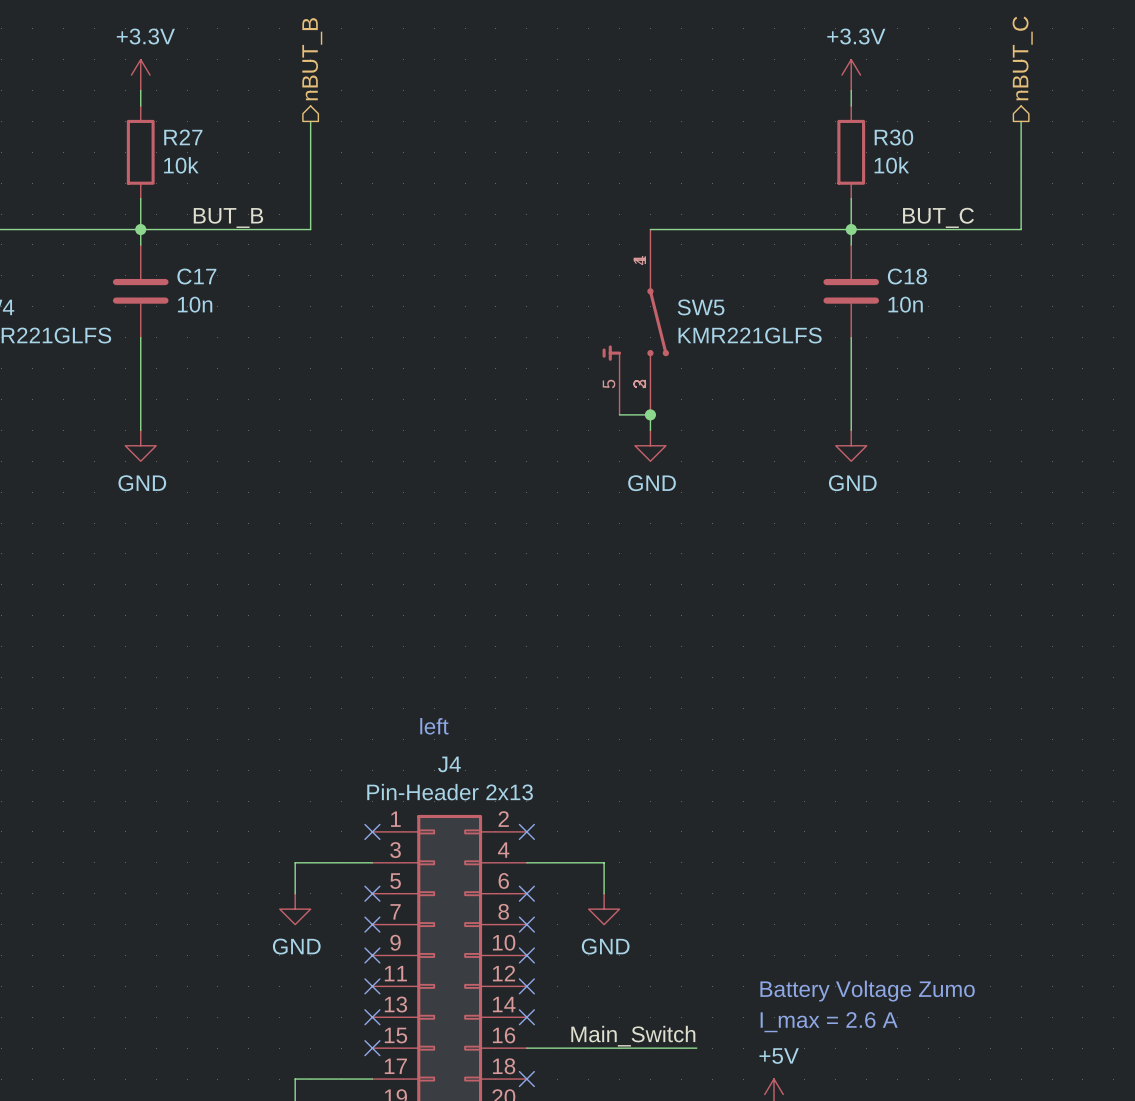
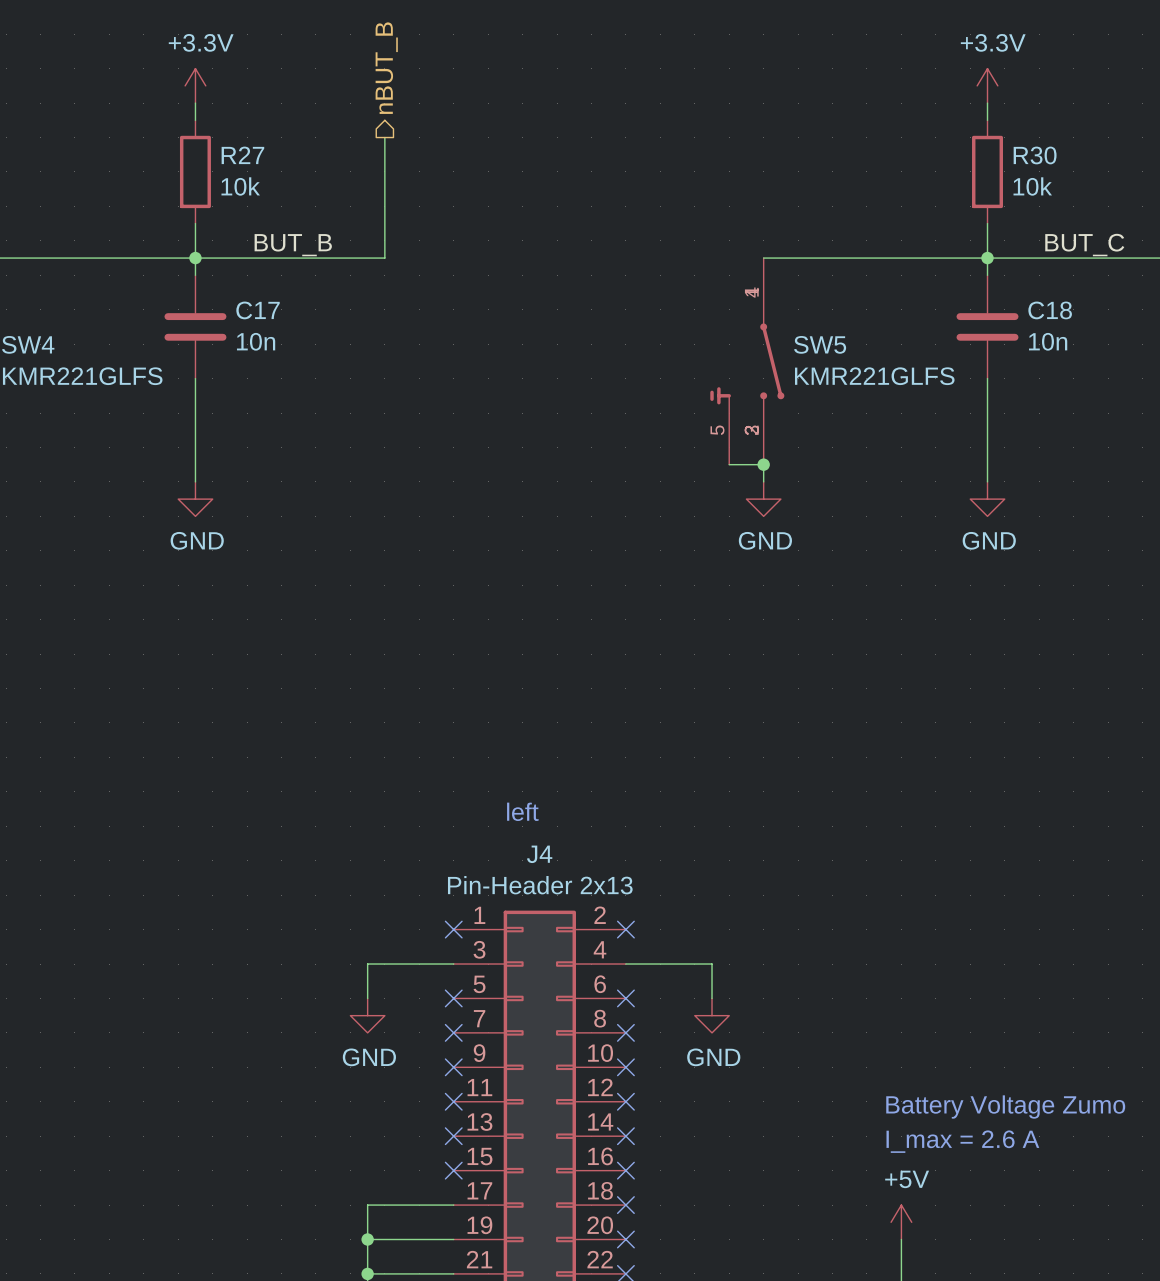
label: Main_Switch (633, 1036) -> none
wire: (526, 1048) (696, 1048) -> none
no-connect mark: none -> (625, 1170)

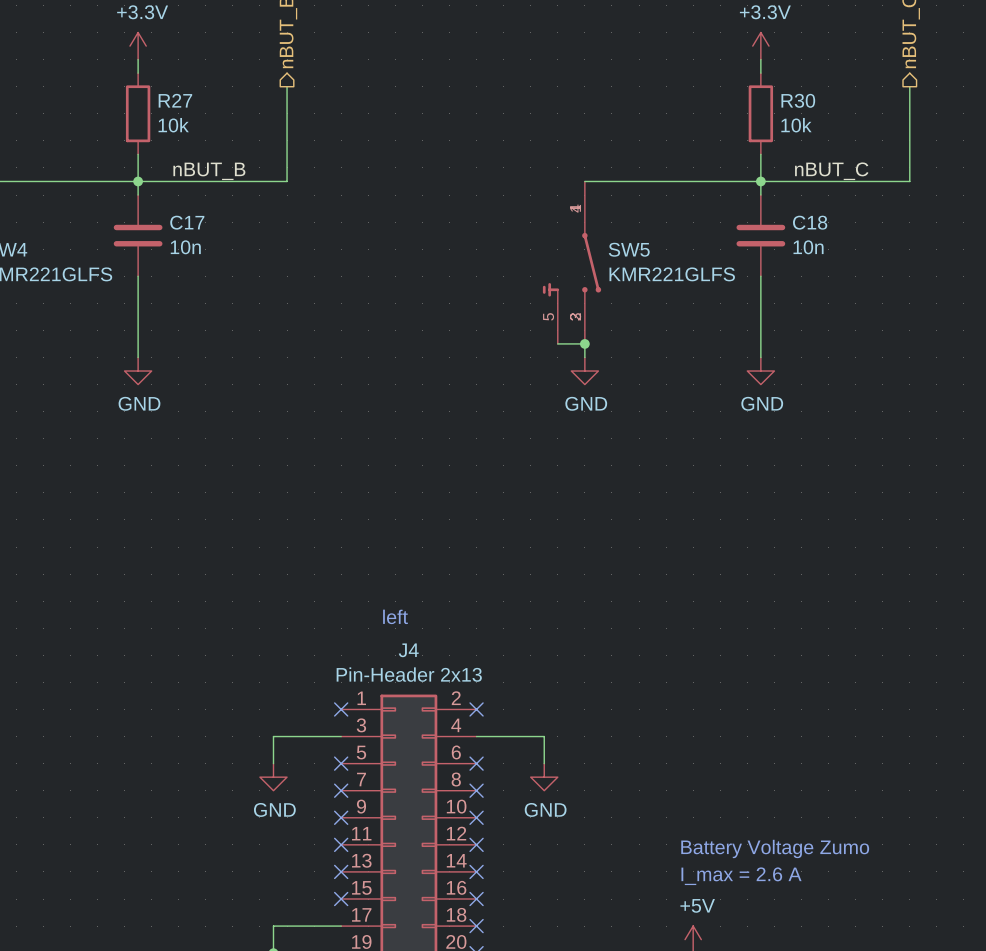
label: BUT_B (293, 245) -> nBUT_B (209, 171)
label: BUT_C (1084, 245) -> nBUT_C (831, 171)

